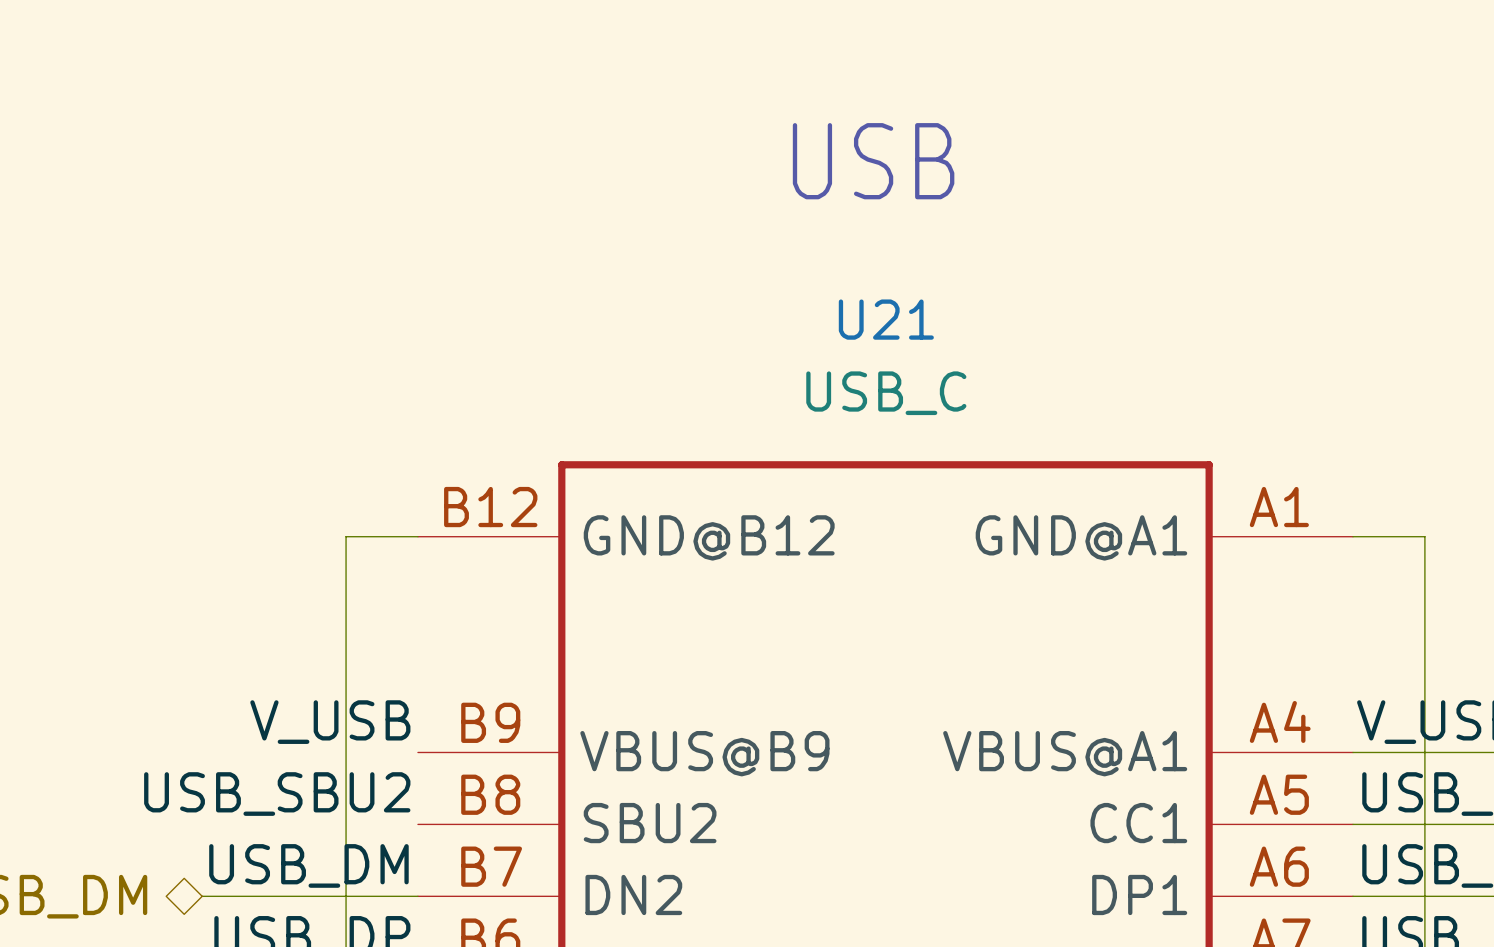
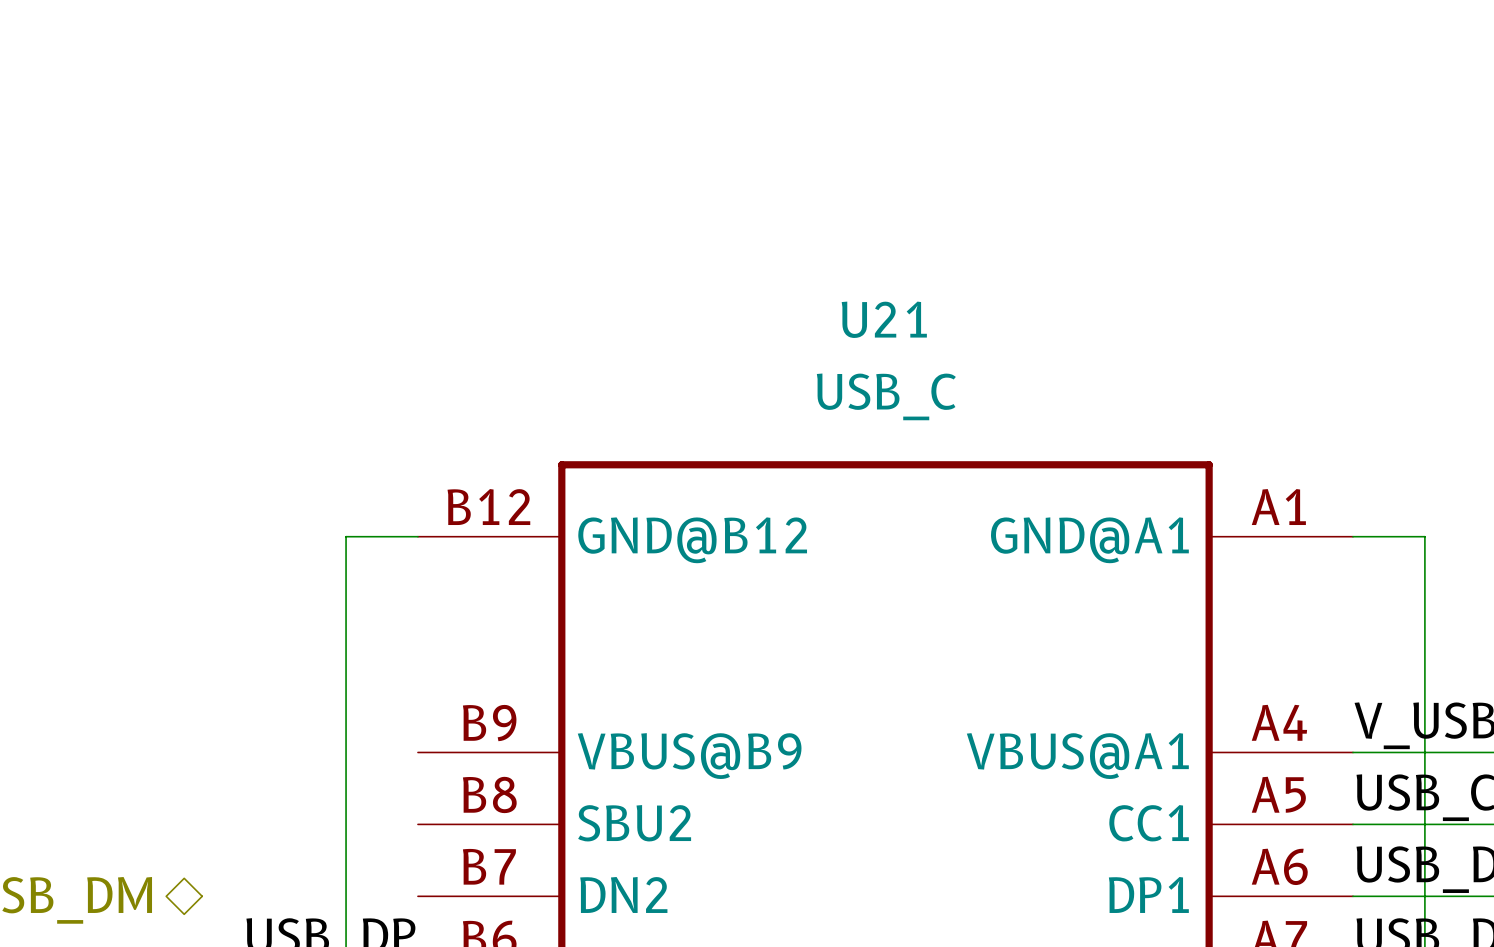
text: USB (873, 161) -> none
label: V_USB (330, 722) -> none
label: USB_SBU2 (277, 794) -> none
label: USB_DM (308, 865) -> none
wire: (202, 896) (417, 896) -> none

